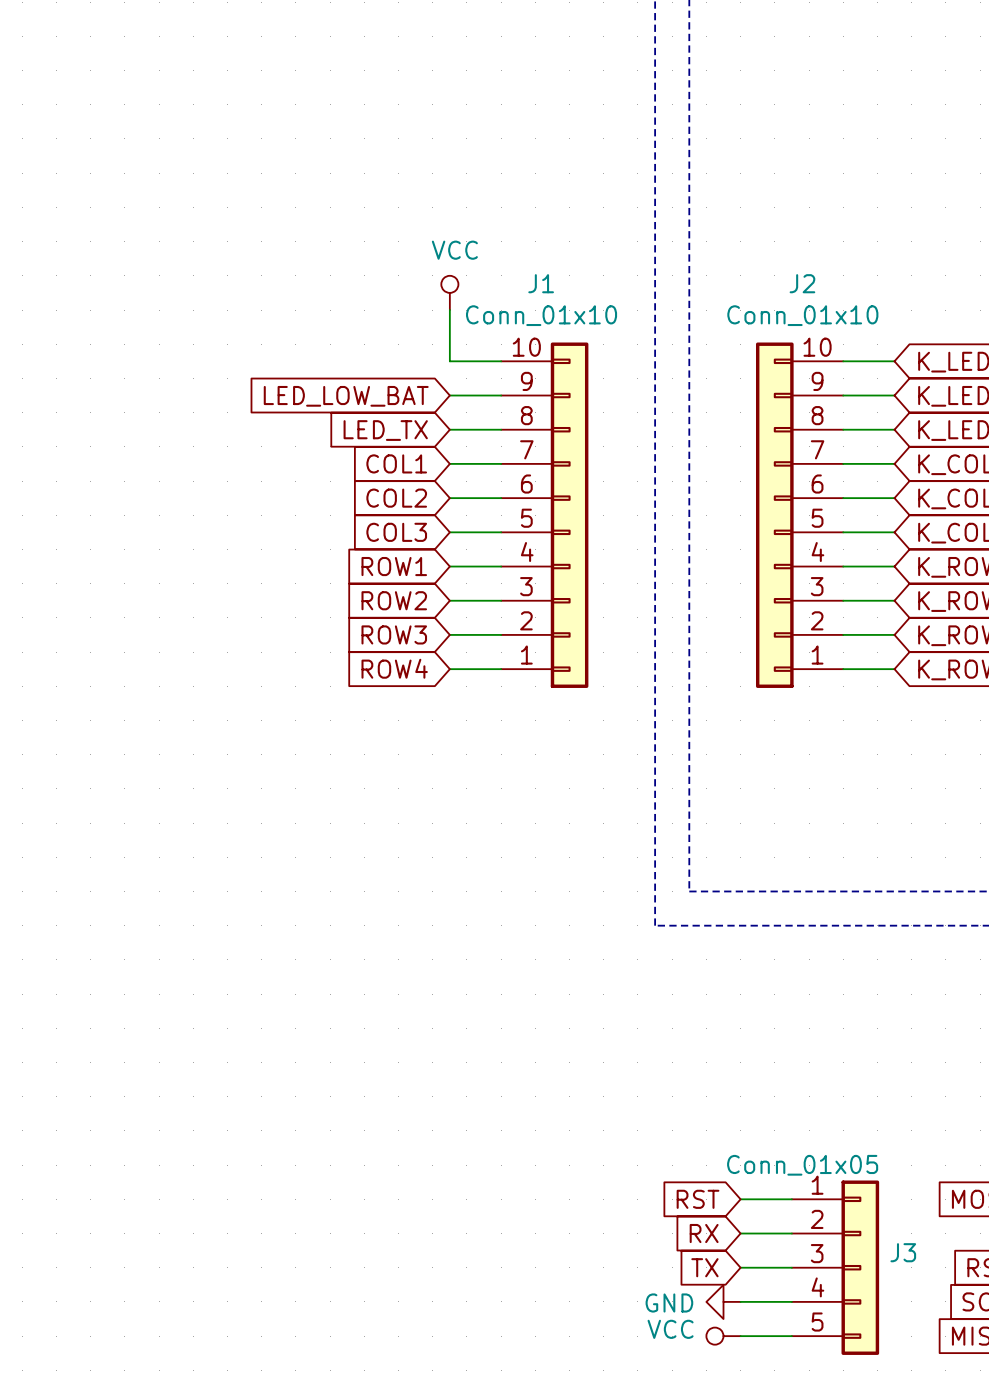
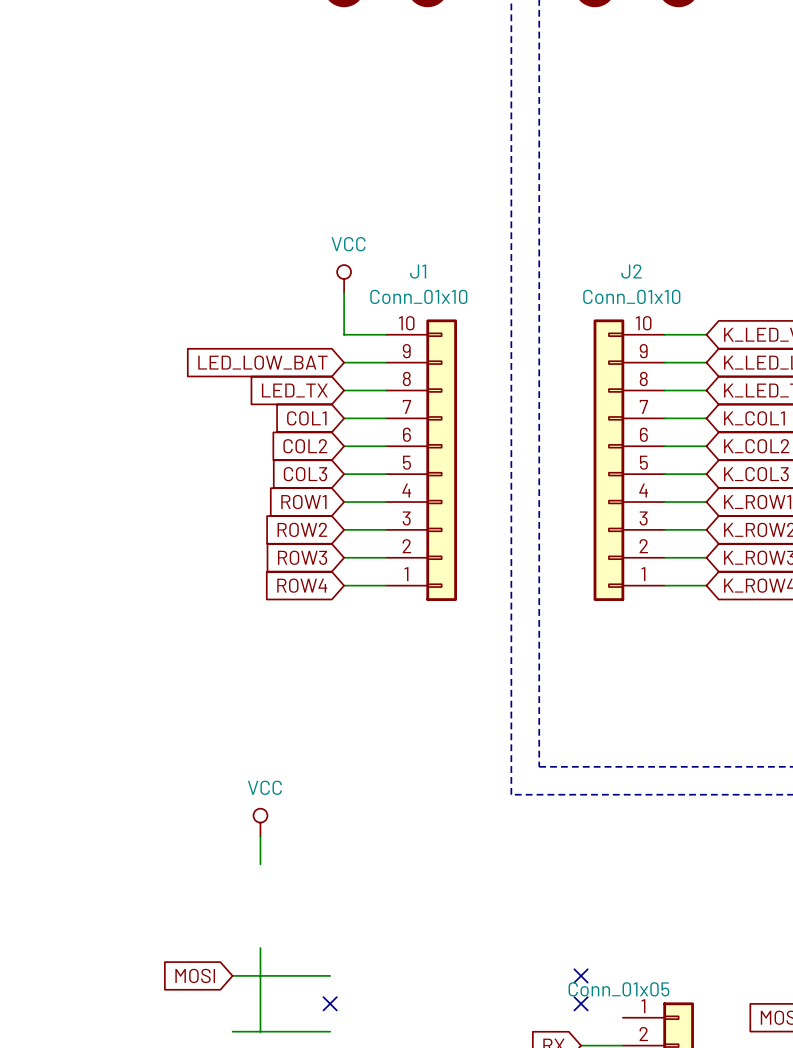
power symbol: none -> VCC (260, 822)
wire: none -> (260, 836) (260, 864)
wire: none -> (260, 948) (260, 1031)
global label: none -> MOSI (195, 975)
wire: none -> (232, 975) (330, 975)
no-connect mark: none -> (581, 975)
no-connect mark: none -> (330, 1003)
no-connect mark: none -> (581, 1003)
global label: RST (698, 1199) -> none
wire: (740, 1199) (791, 1199) -> none
wire: none -> (232, 1031) (330, 1031)

